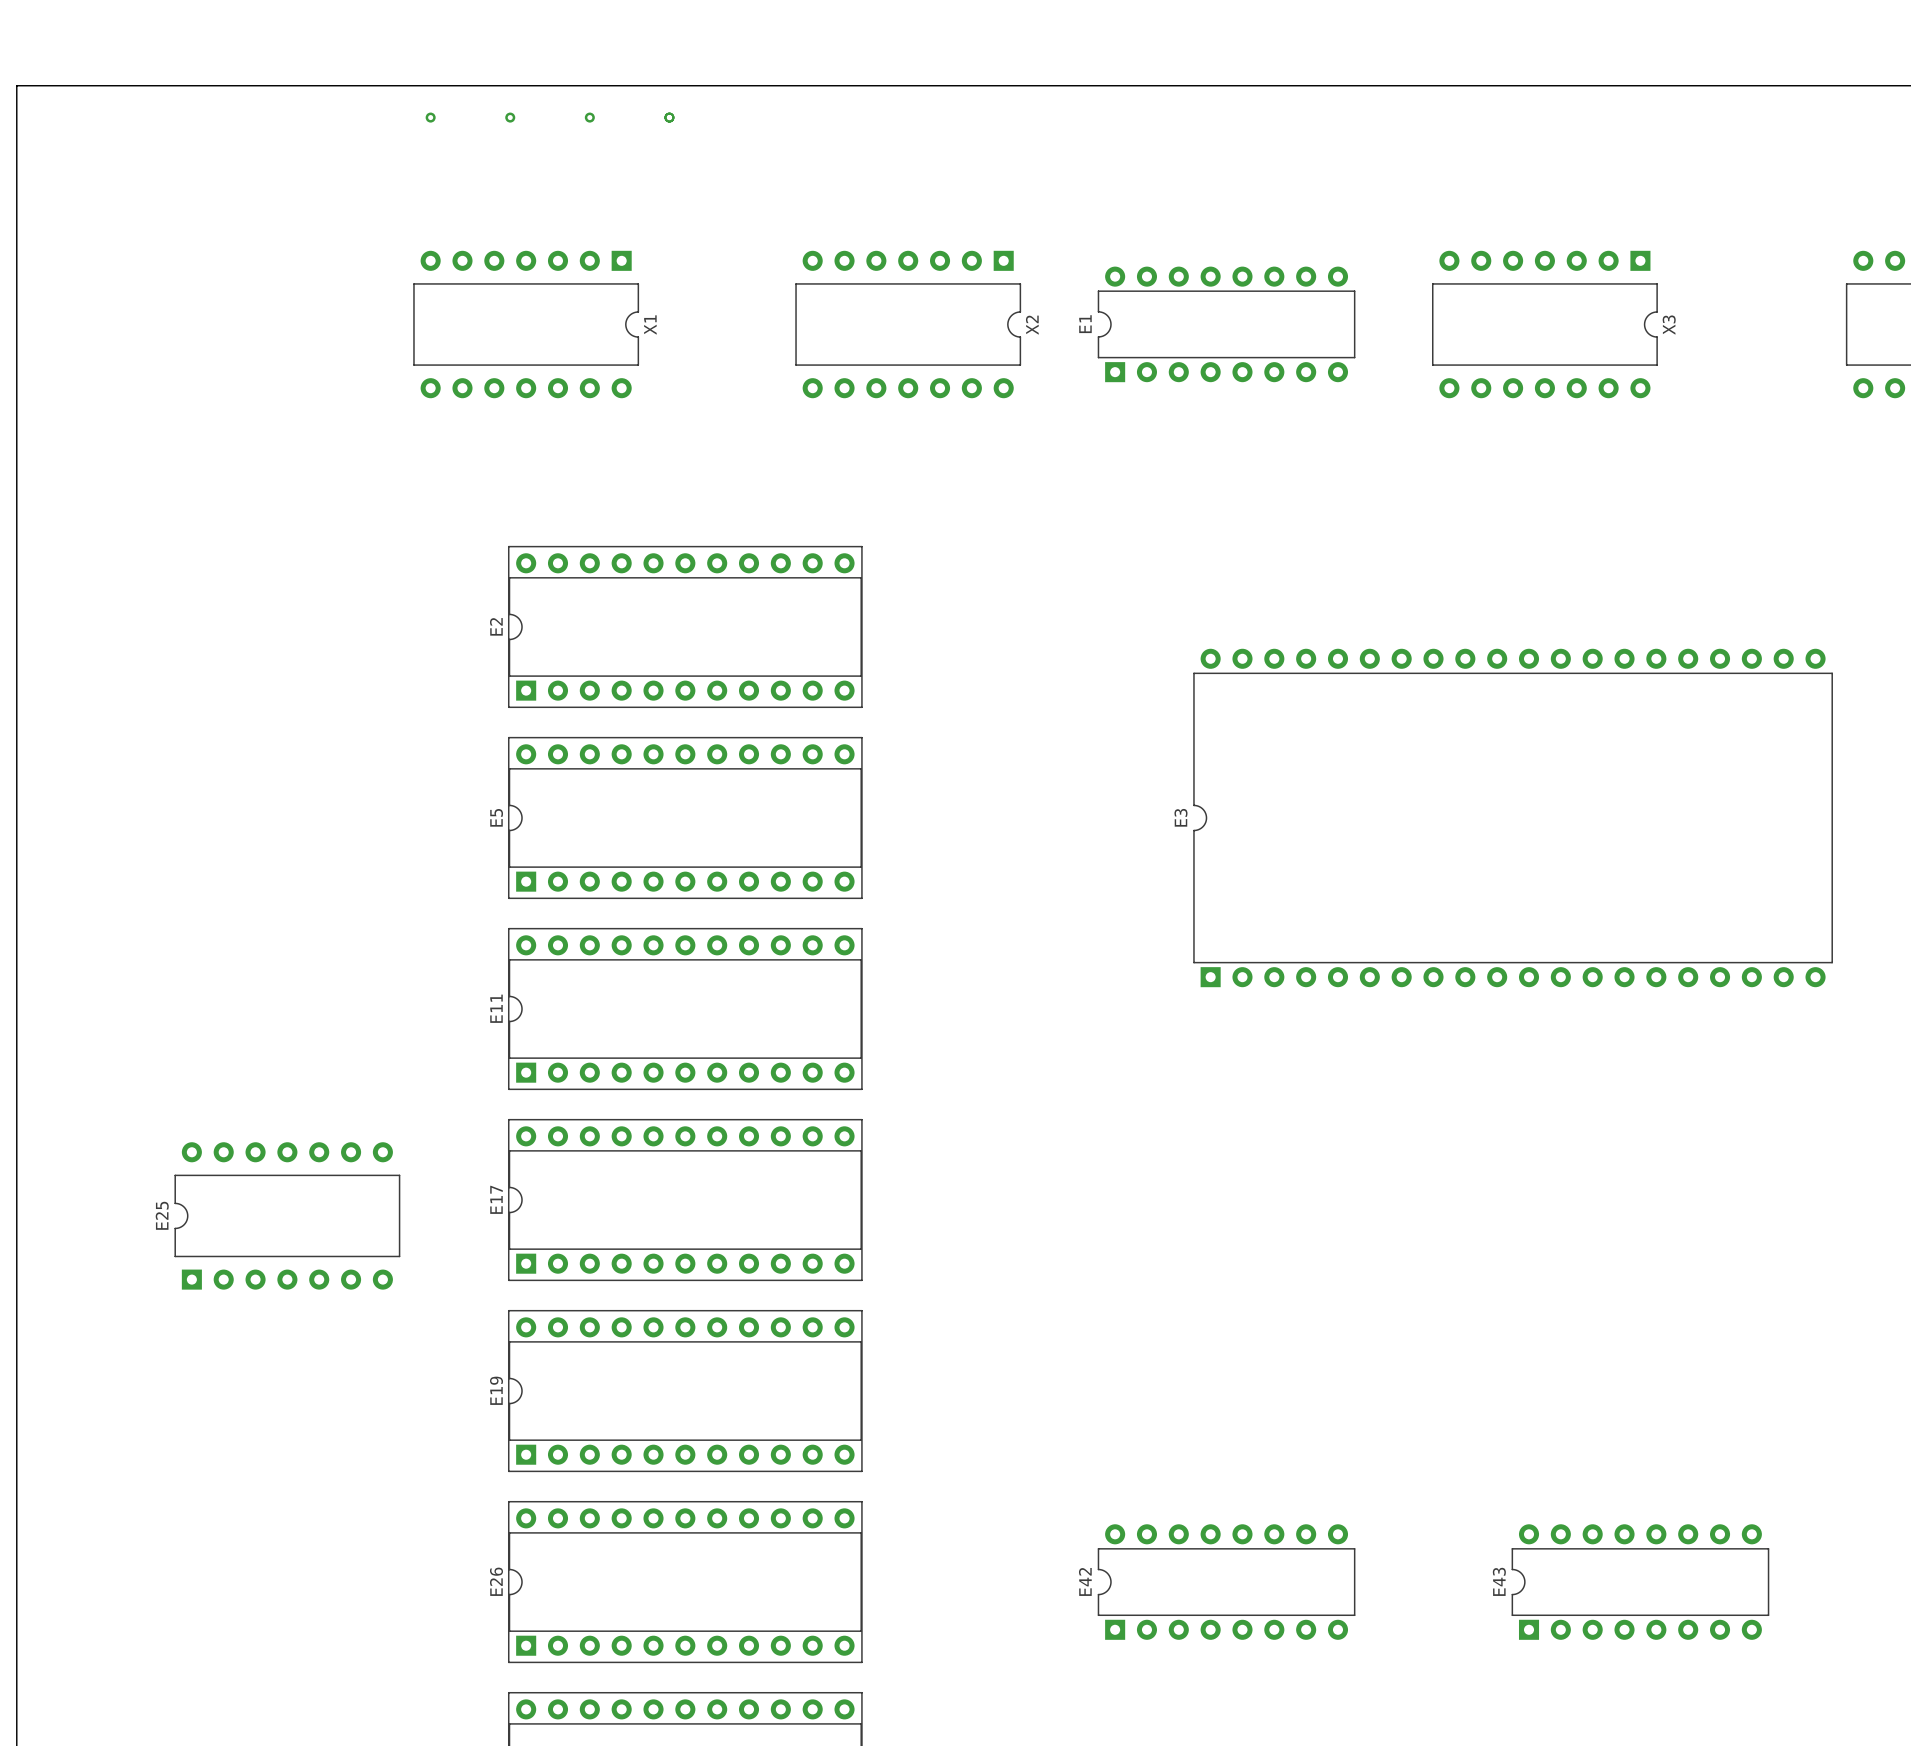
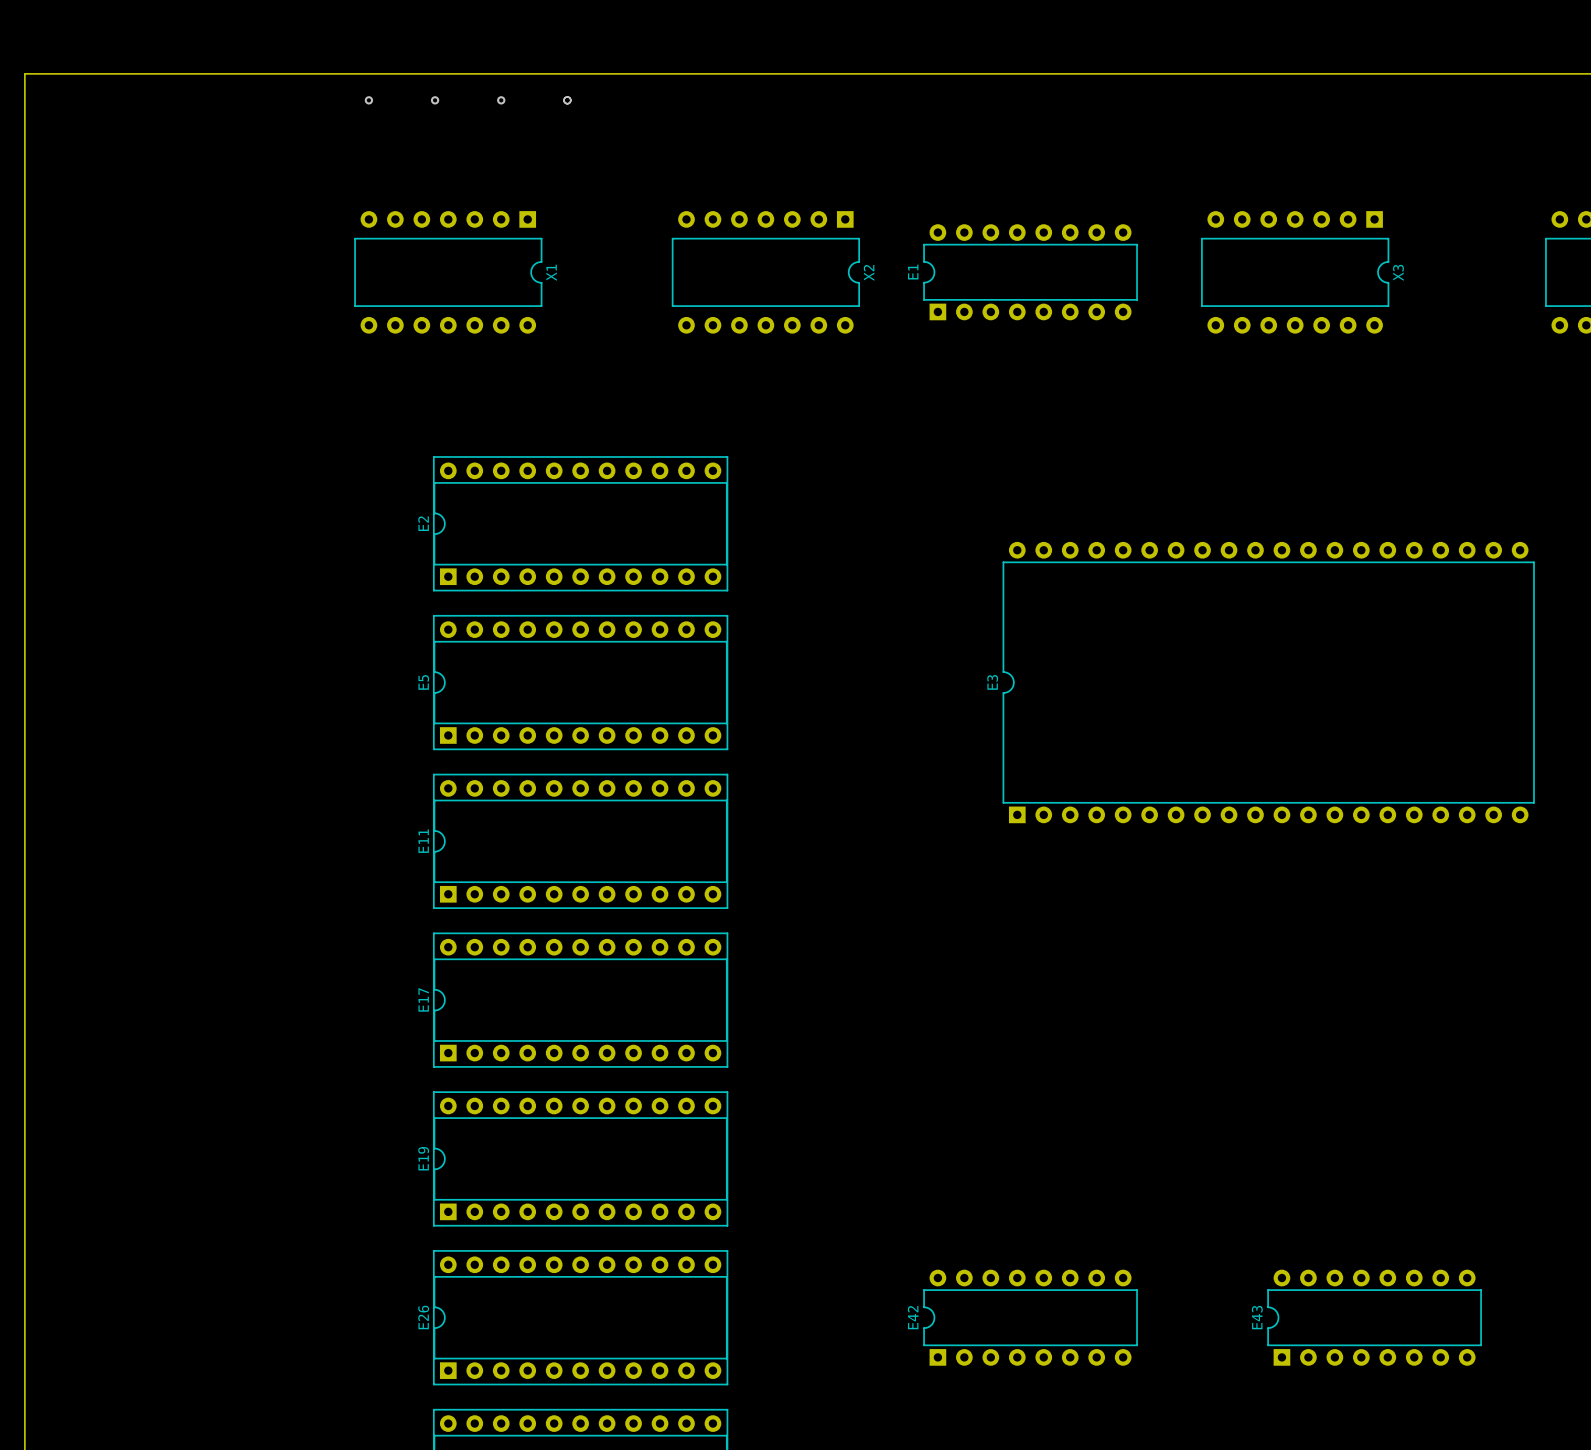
E25: (287, 1215) -> none

